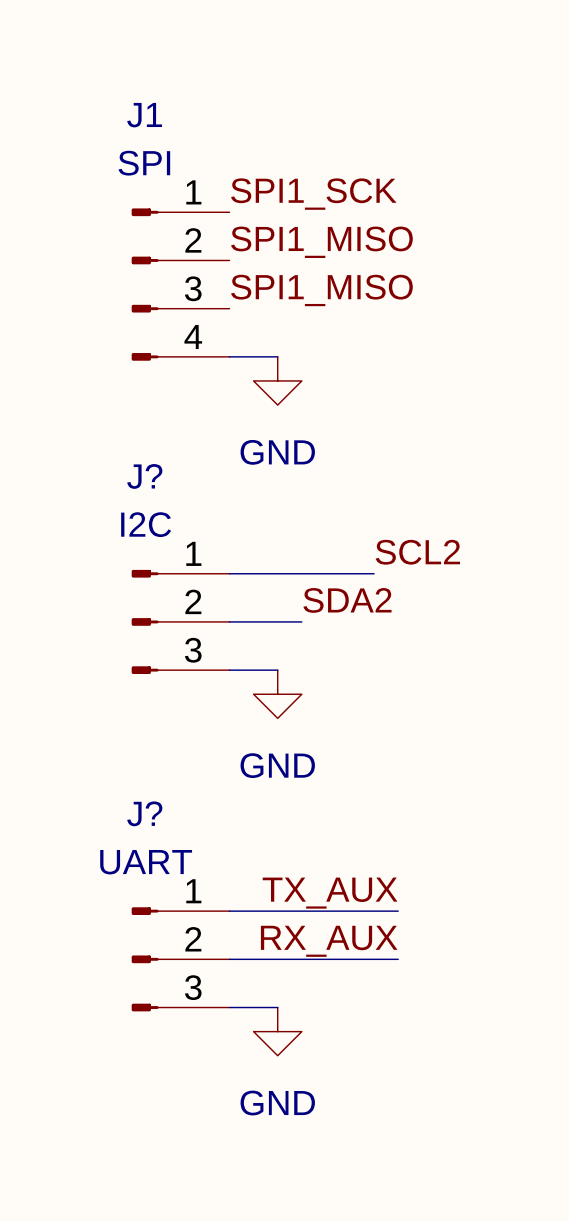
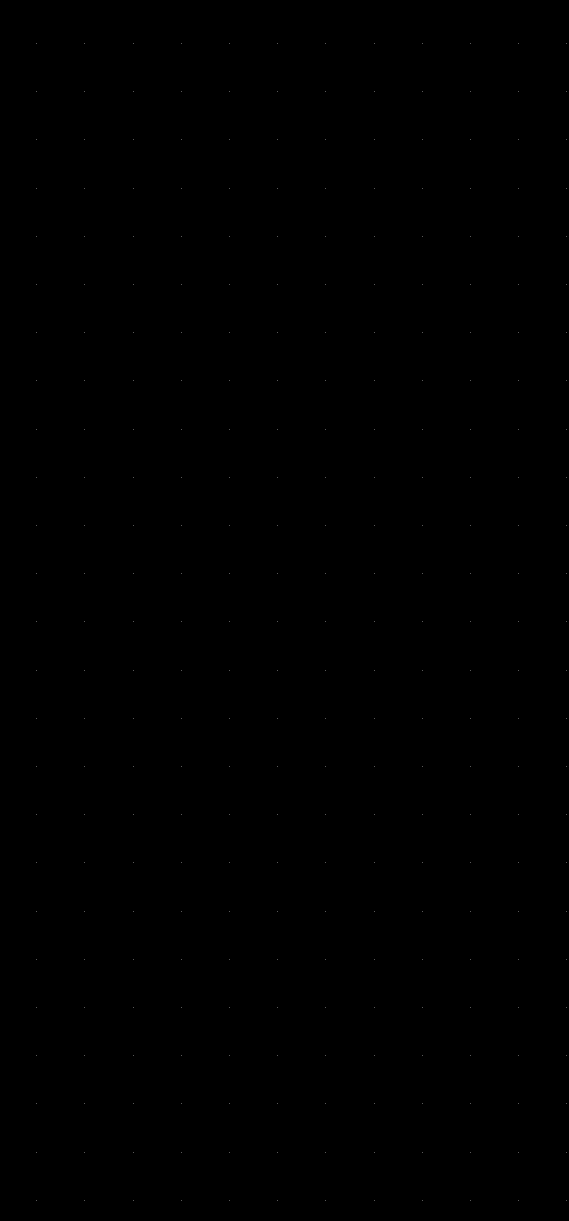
label: SPI1_SCK (313, 194) -> none
label: SPI1_MISO (321, 242) -> none
J1: SPI (180, 284) -> none
label: SPI1_MISO (321, 290) -> none
wire: (229, 356) (277, 356) -> none
power symbol: GND (277, 380) -> none
label: SCL2 (417, 552) -> none
wire: (229, 573) (374, 573) -> none
label: SDA2 (347, 600) -> none
J?: I2C (180, 621) -> none
wire: (229, 621) (301, 621) -> none
wire: (229, 670) (277, 670) -> none
power symbol: GND (277, 694) -> none
label: TX_AUX (330, 893) -> none
wire: (229, 911) (398, 911) -> none
label: RX_AUX (329, 941) -> none
J?: UART (180, 959) -> none
wire: (229, 959) (398, 959) -> none
wire: (229, 1007) (277, 1007) -> none
power symbol: GND (277, 1031) -> none

